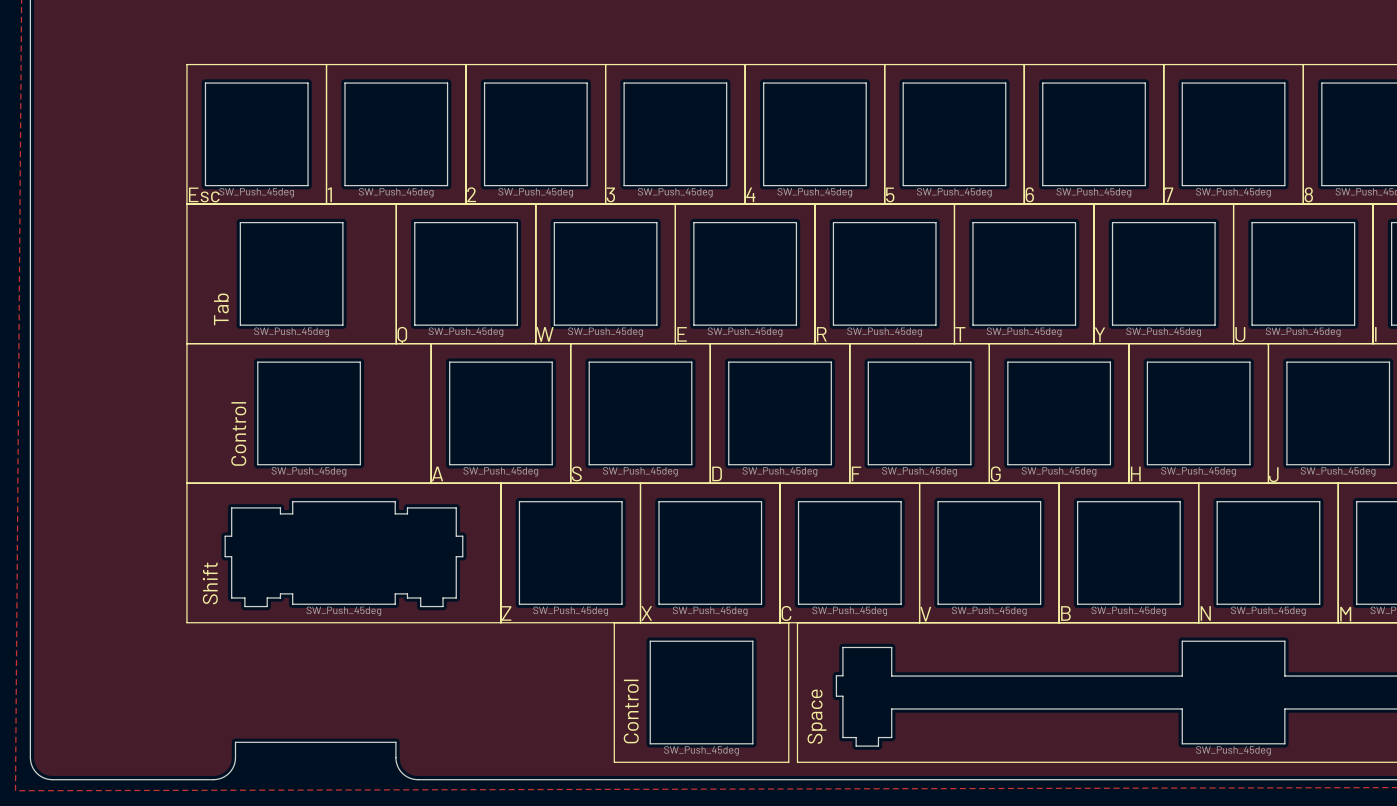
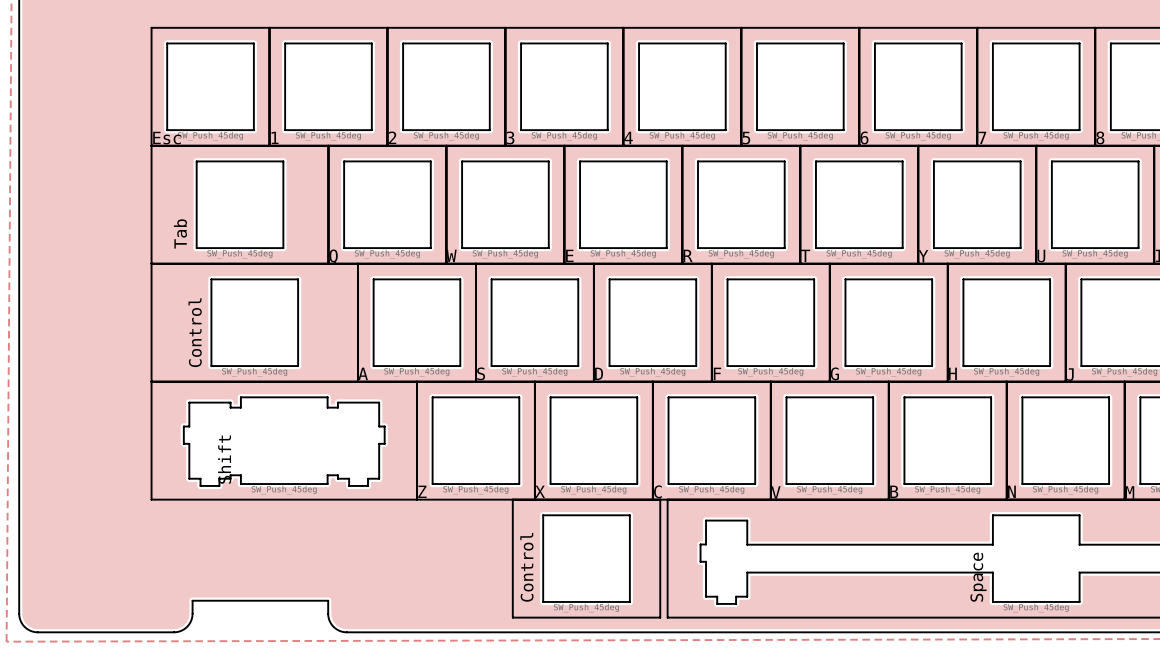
text position: Shift (210, 583) -> Shift (224, 459)
text: Space (816, 716) -> none
text: none -> Space (978, 577)

